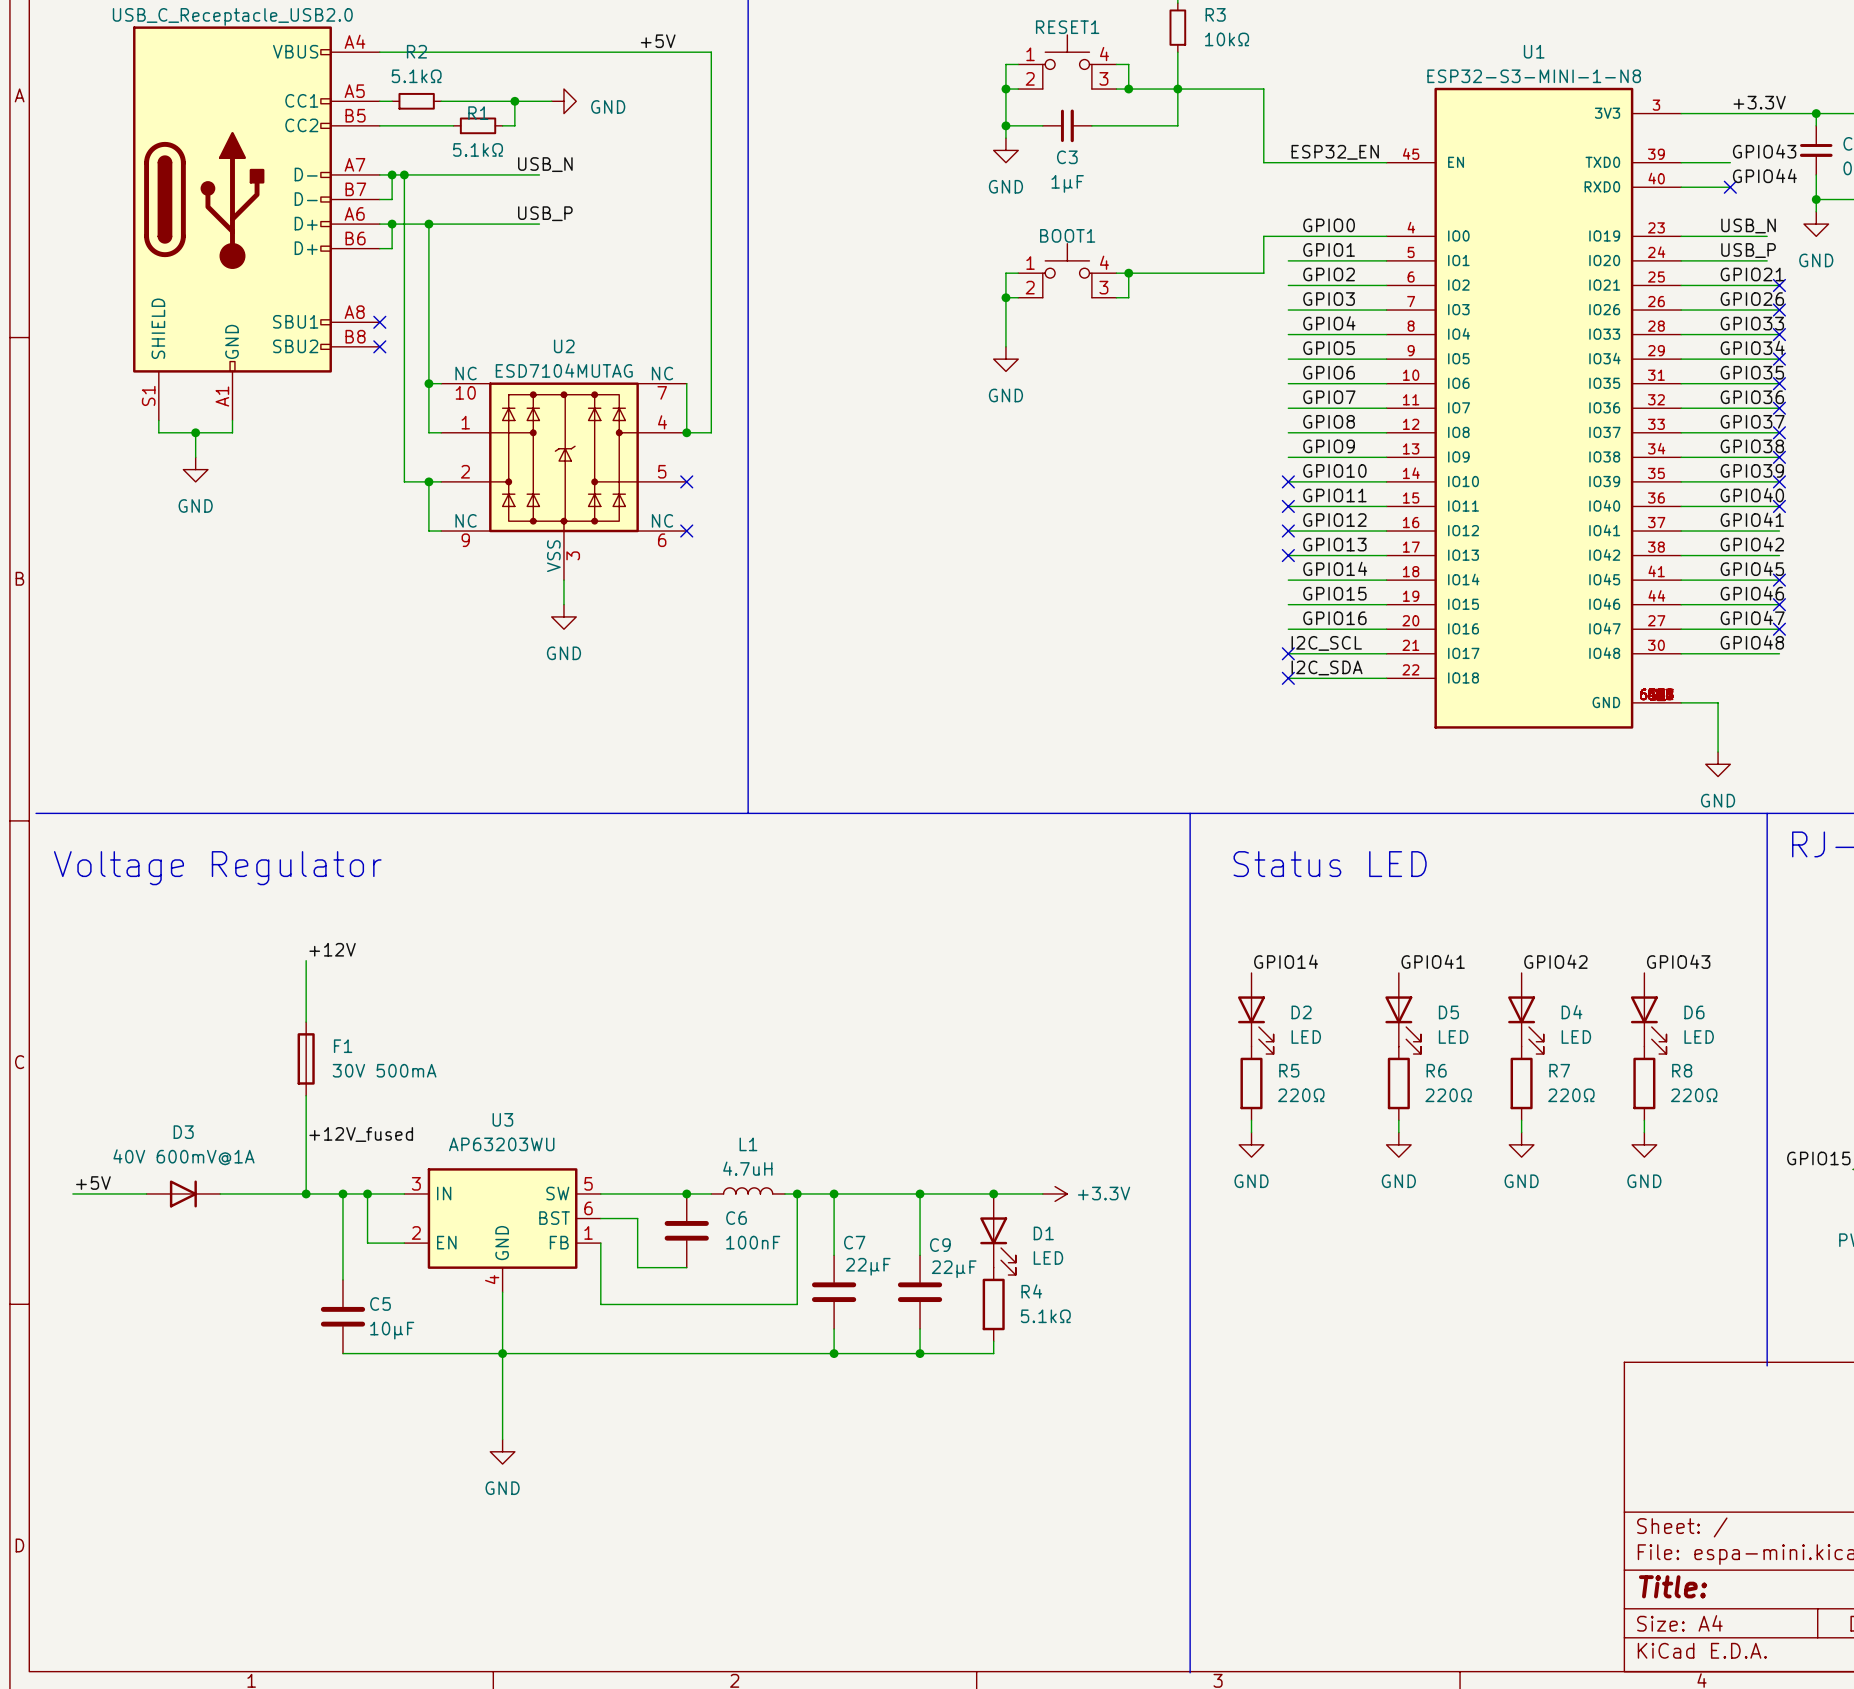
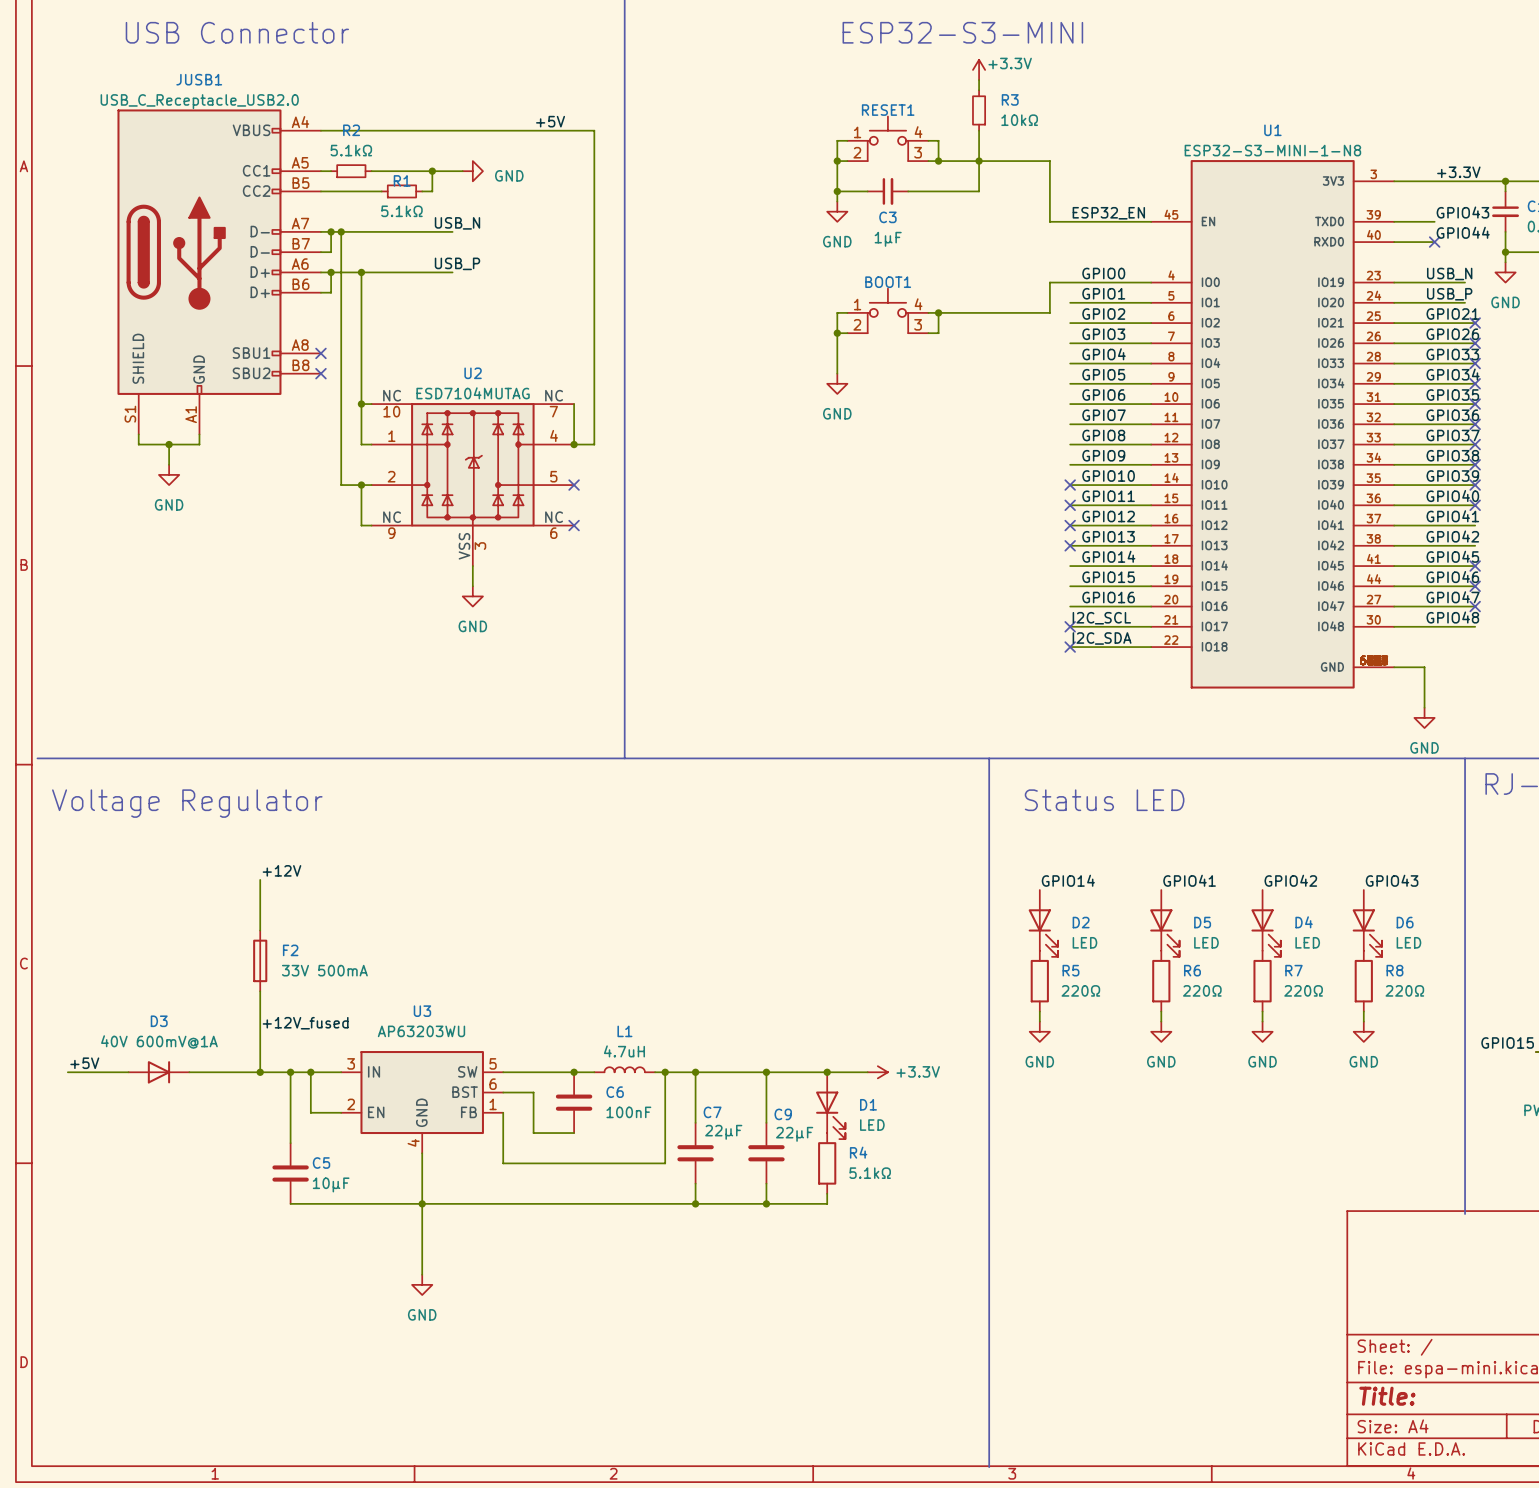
F1 name: F1 (343, 1046) -> F2 (290, 950)
F1 value: 30V 500mA (384, 1070) -> 33V 500mA (324, 970)

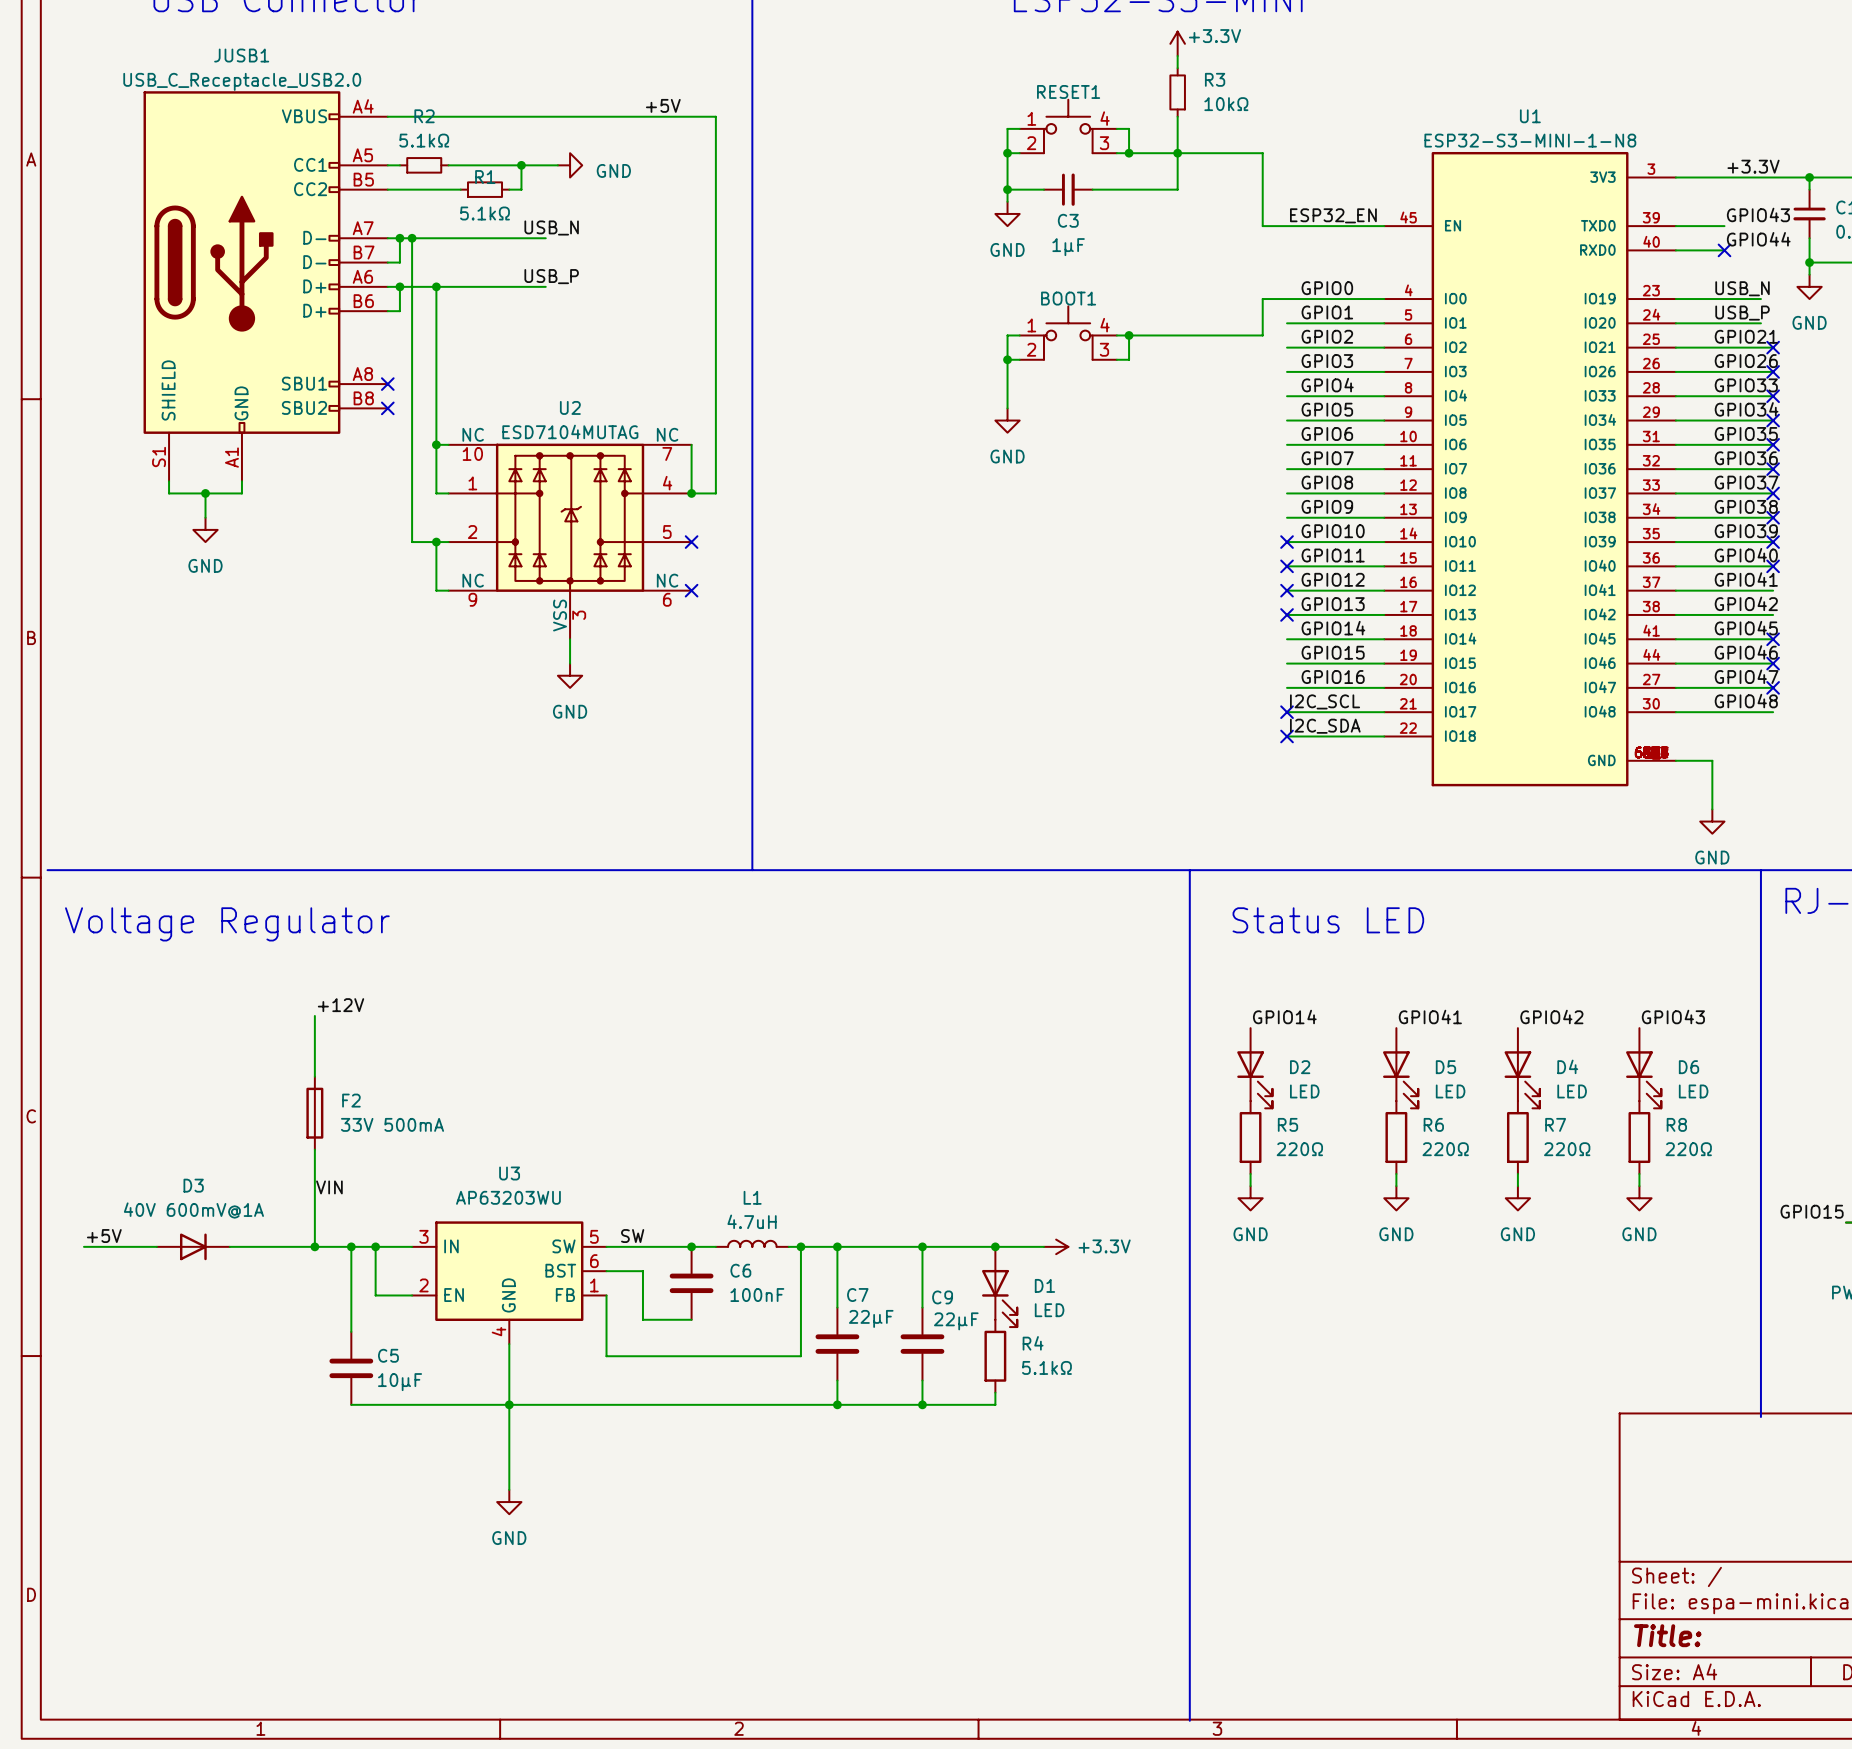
label: +12V_fused (305, 1023) -> VIN (329, 1187)
label: none -> SW (632, 1236)

